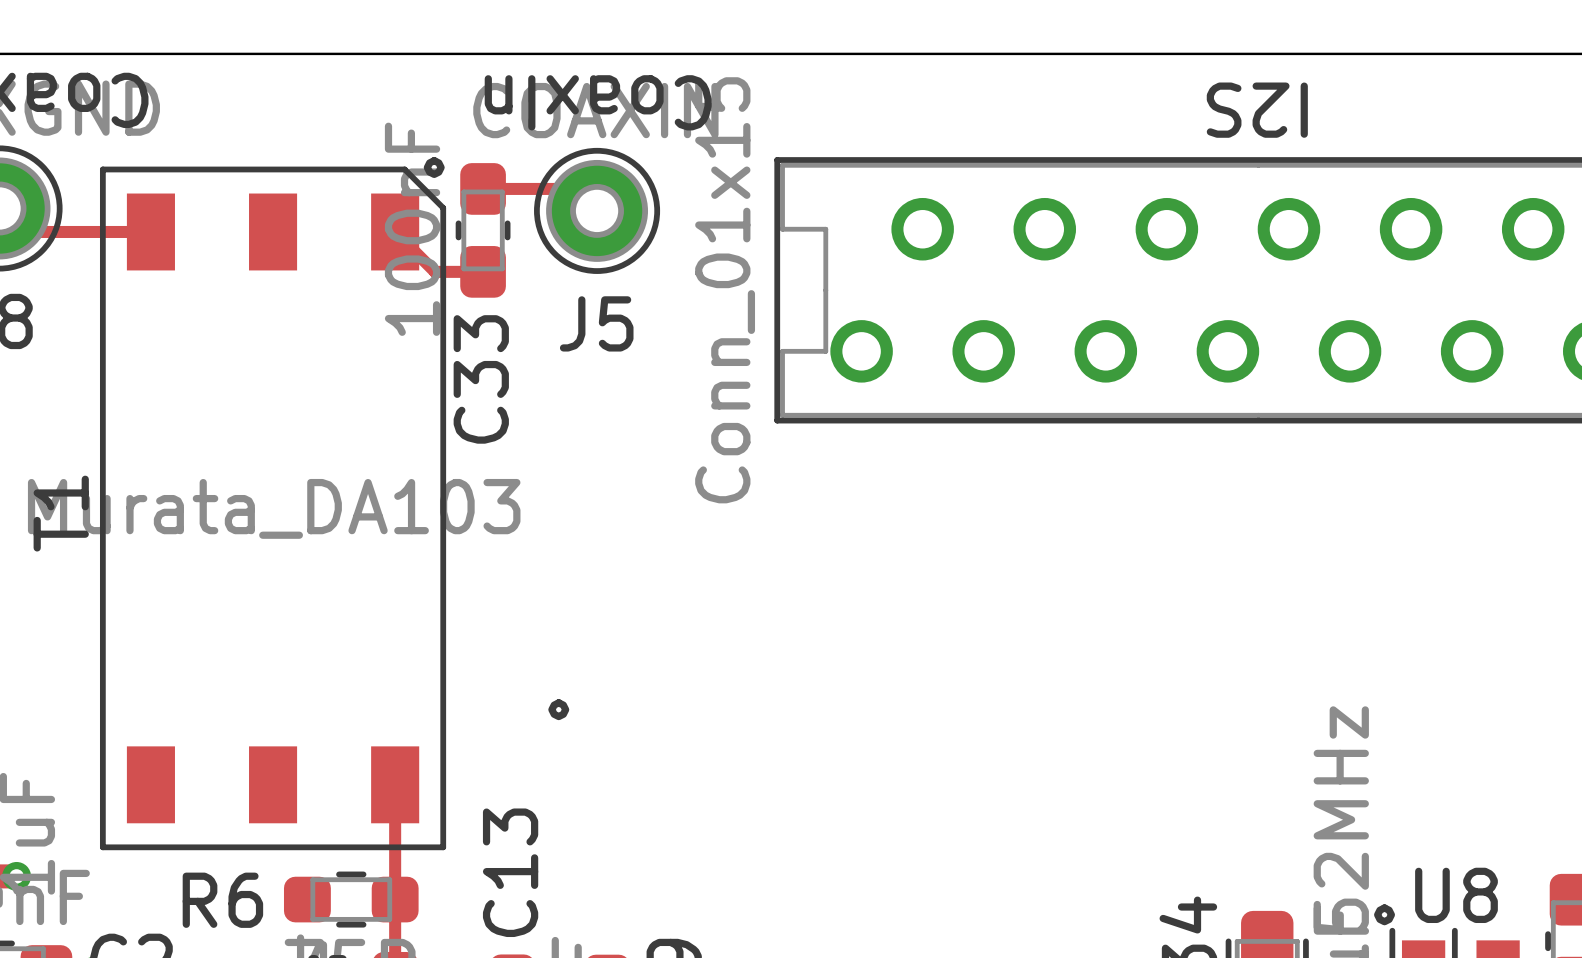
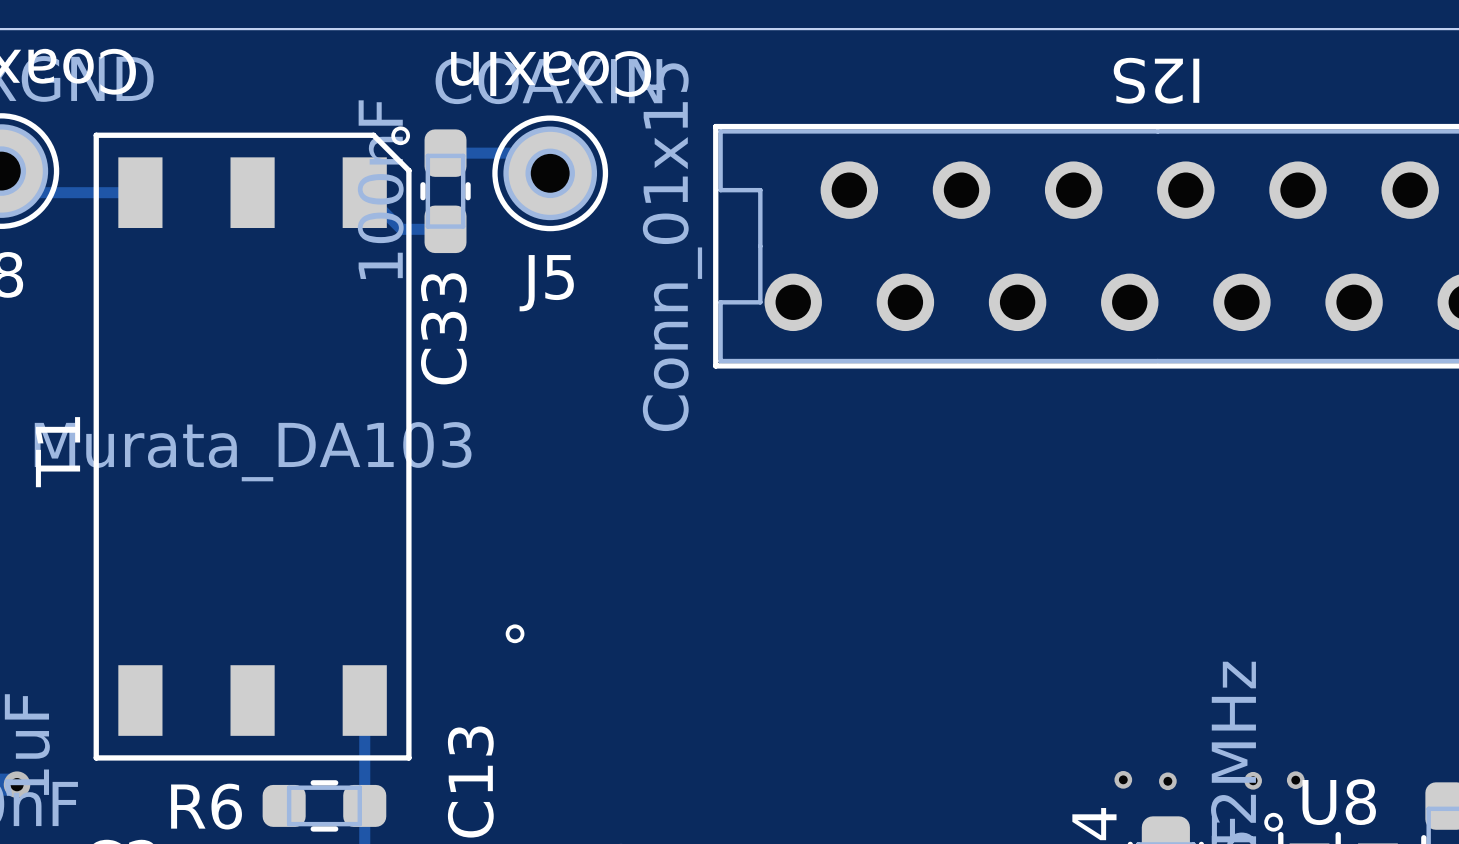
via: none -> (1123, 779)
via: none -> (1295, 780)
via: none -> (1167, 781)
via: none -> (1253, 780)

